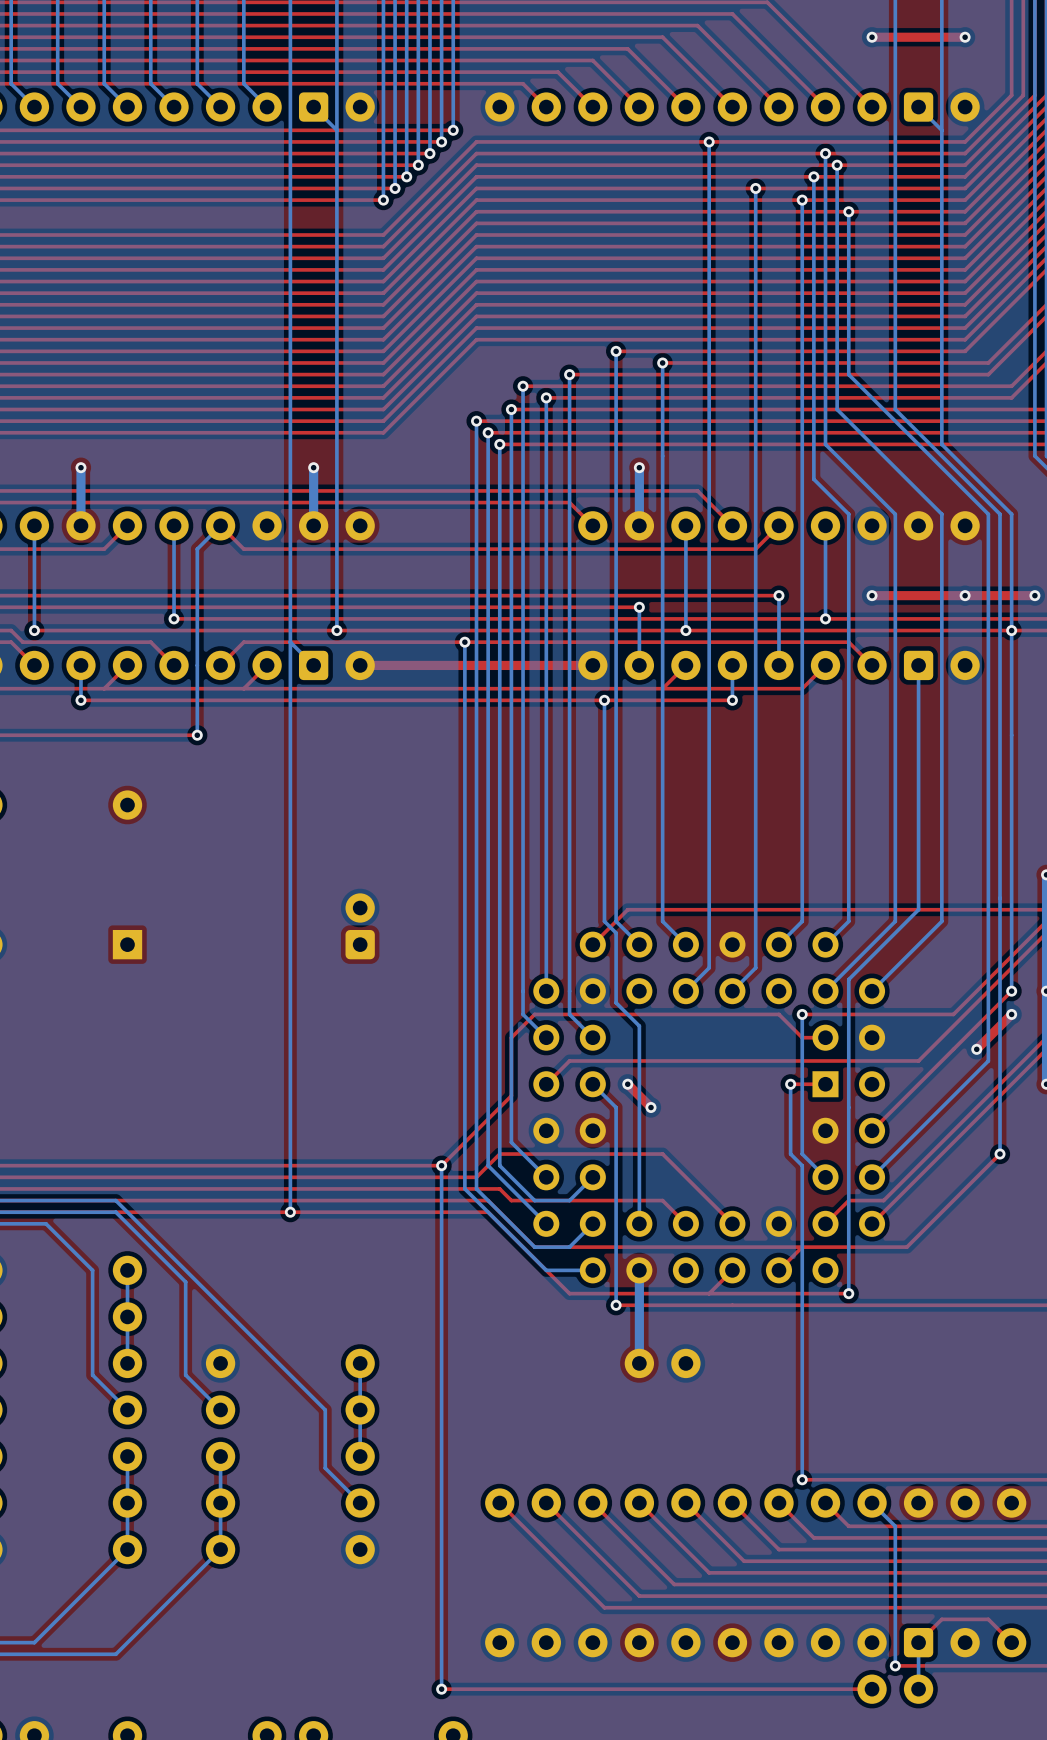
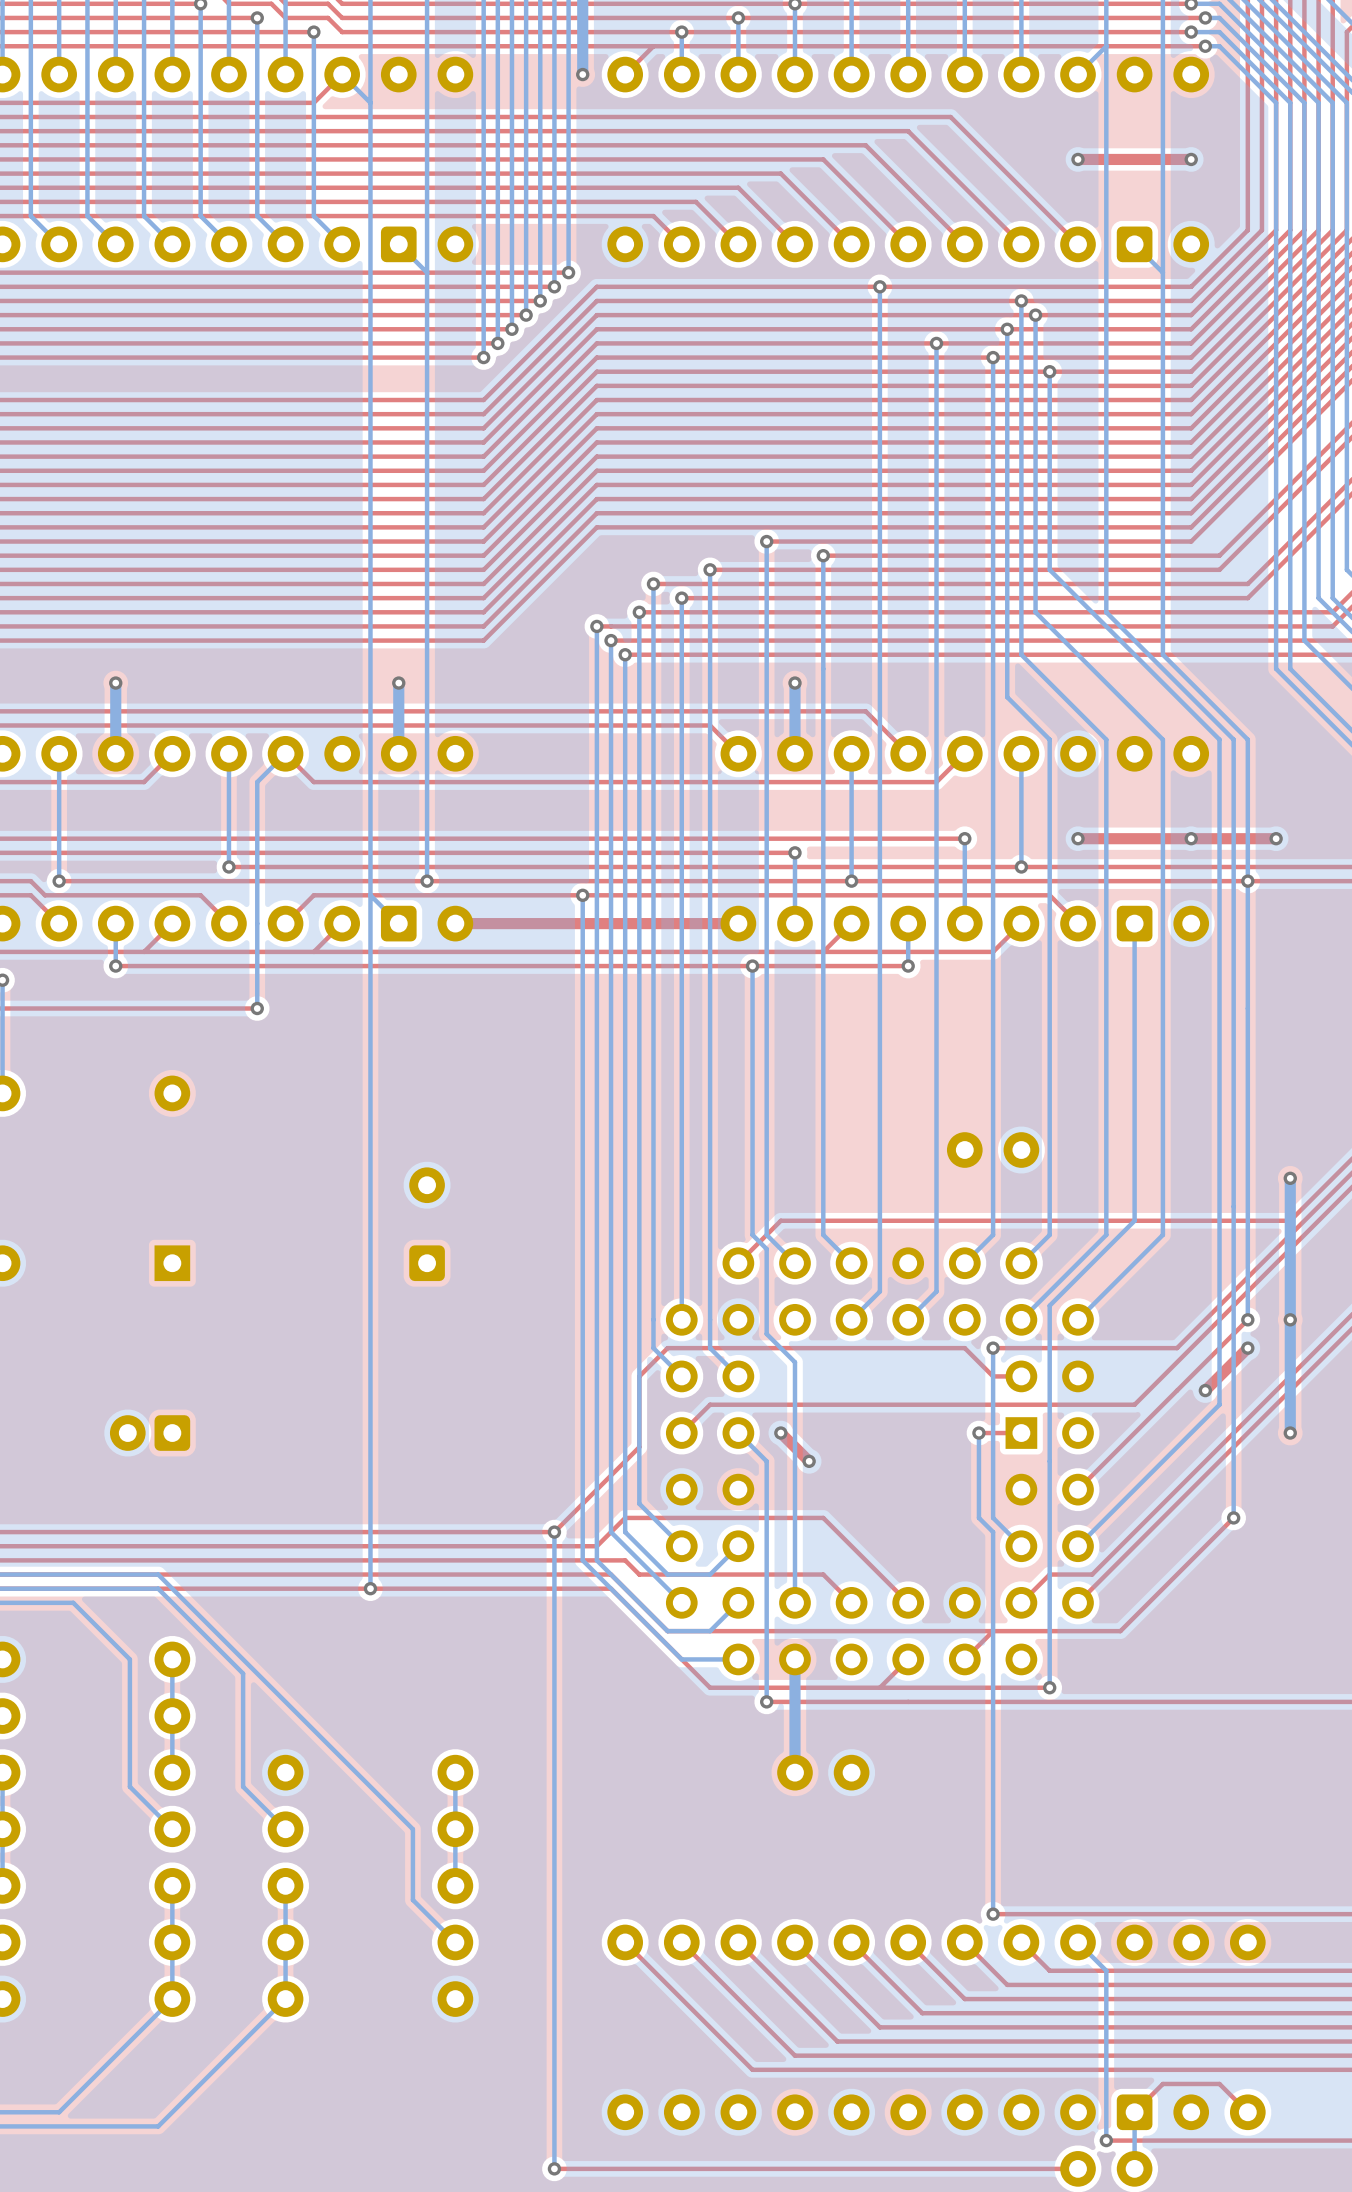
part: none -> (993, 1150)
part: none -> (427, 1224)
part rotation: 0° (360, 926) -> 90° counterclockwise (150, 1433)
part position: (360, 926) -> (150, 1433)

